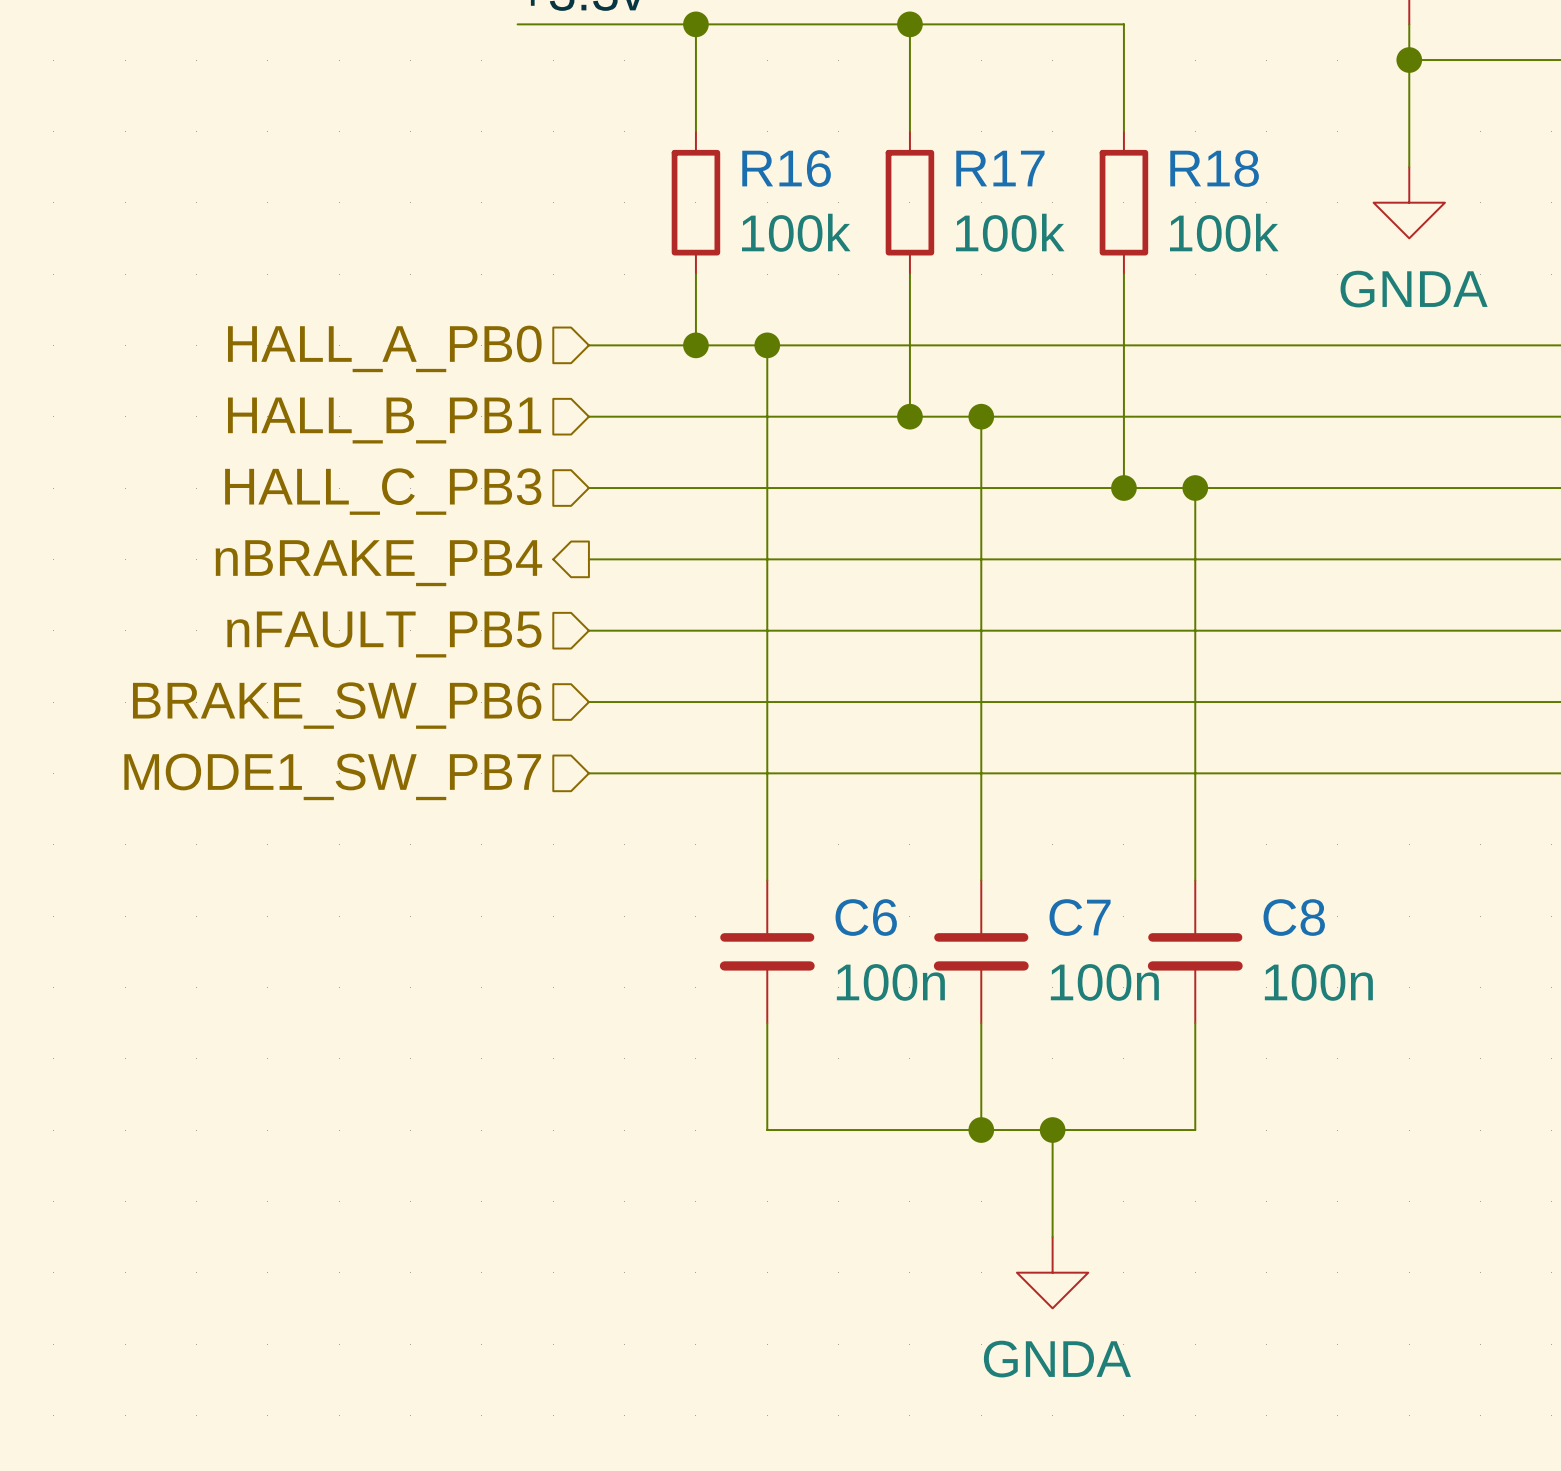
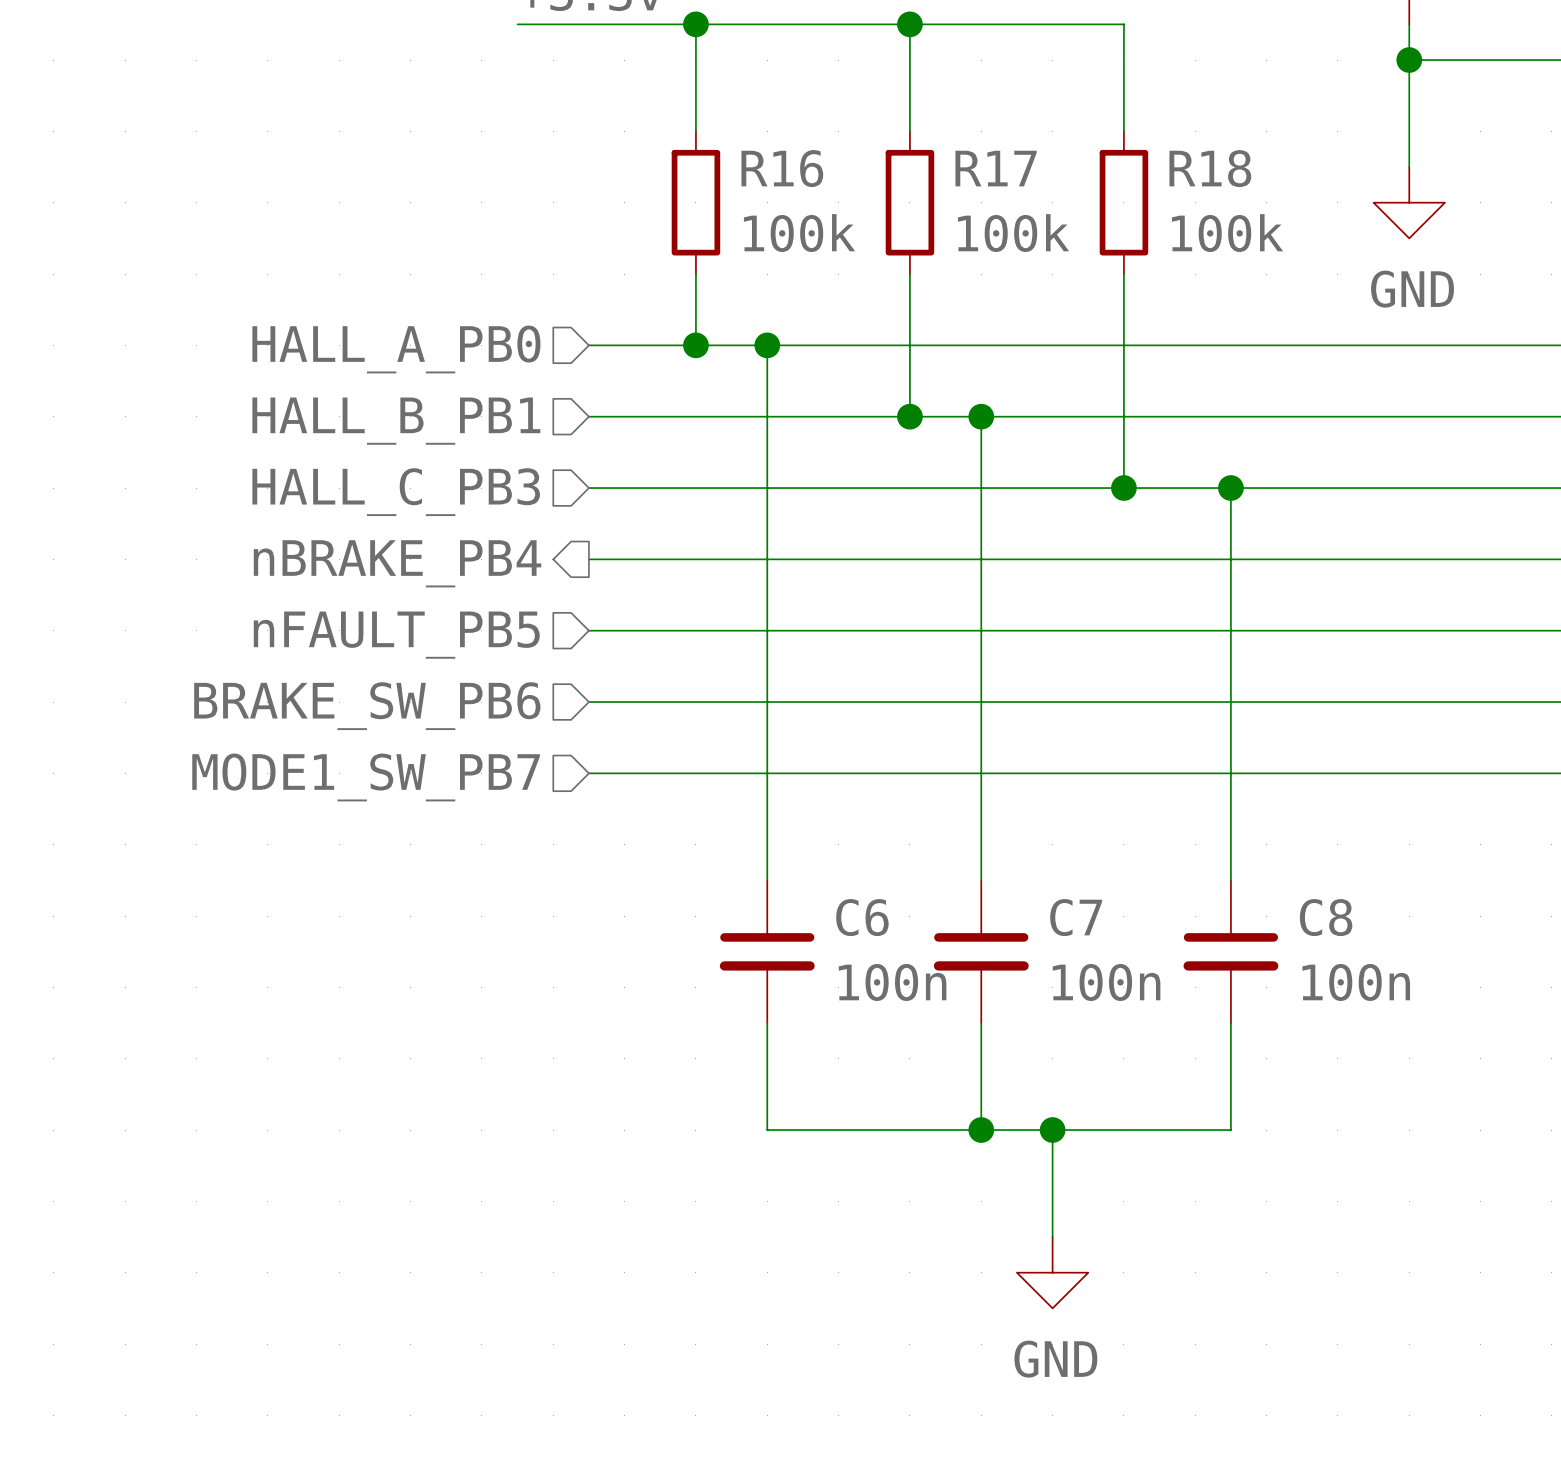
power symbol: GNDA (1409, 202) -> GND (1409, 202)
wire: (1195, 488) (1195, 880) -> (1230, 488) (1230, 880)
junction position: (1195, 488) -> (1230, 488)
C8 position: (1195, 951) -> (1230, 951)
wire: (1195, 1023) (1195, 1130) -> (1230, 1023) (1230, 1130) (1195, 1130)
power symbol: GNDA (1052, 1272) -> GND (1052, 1272)

